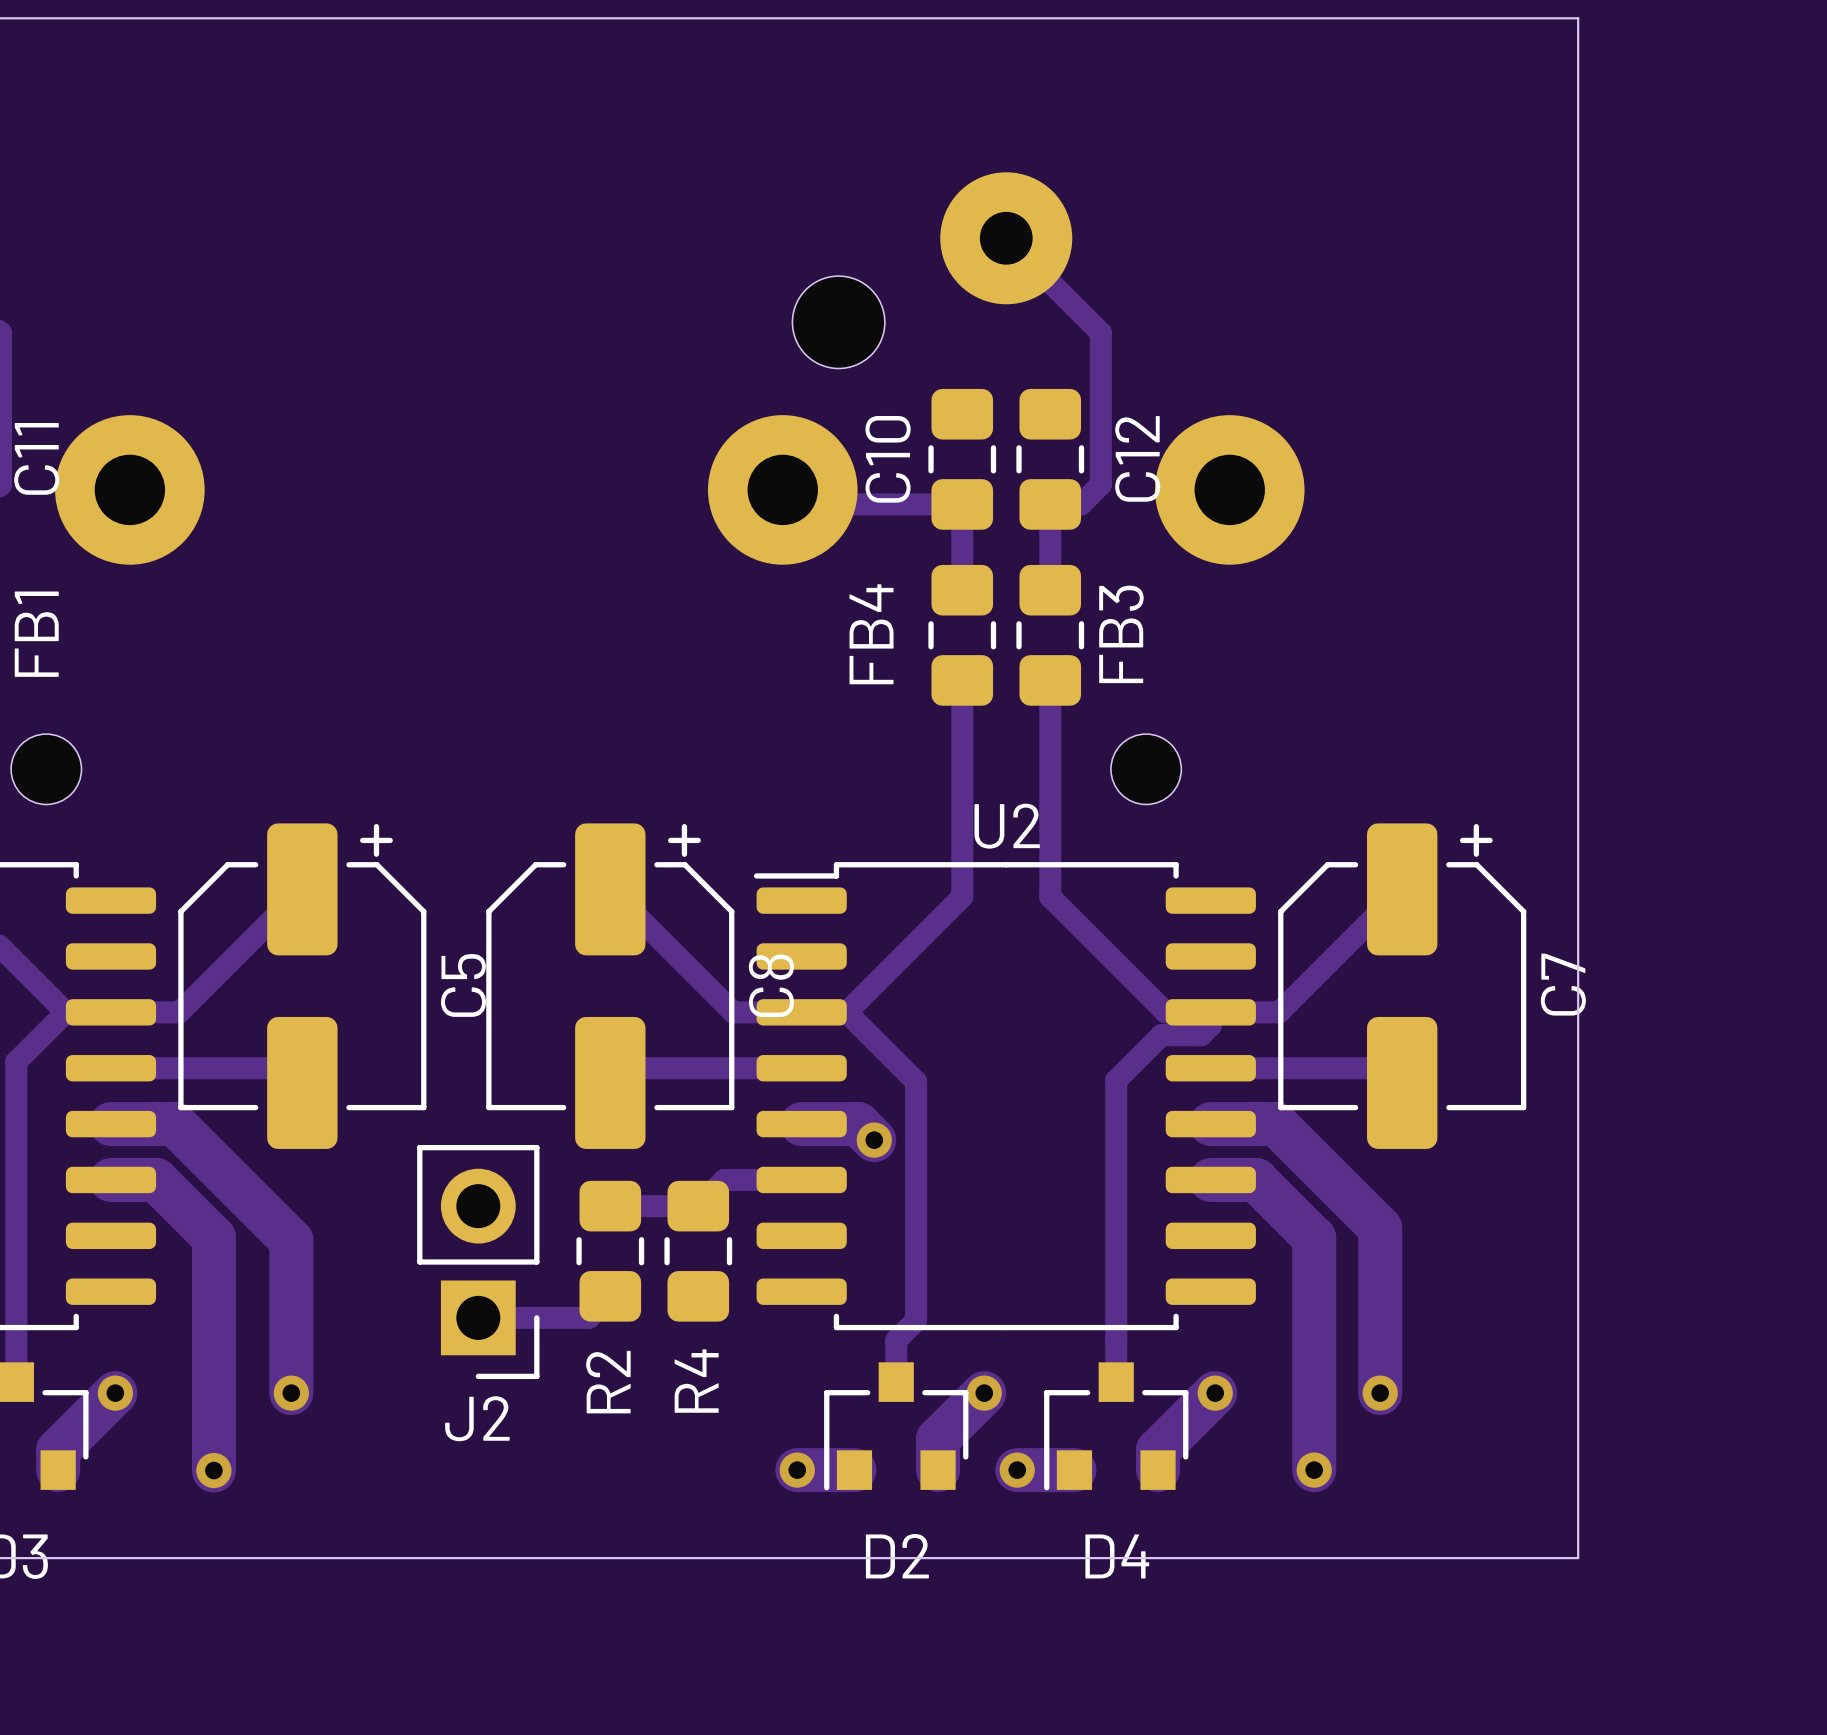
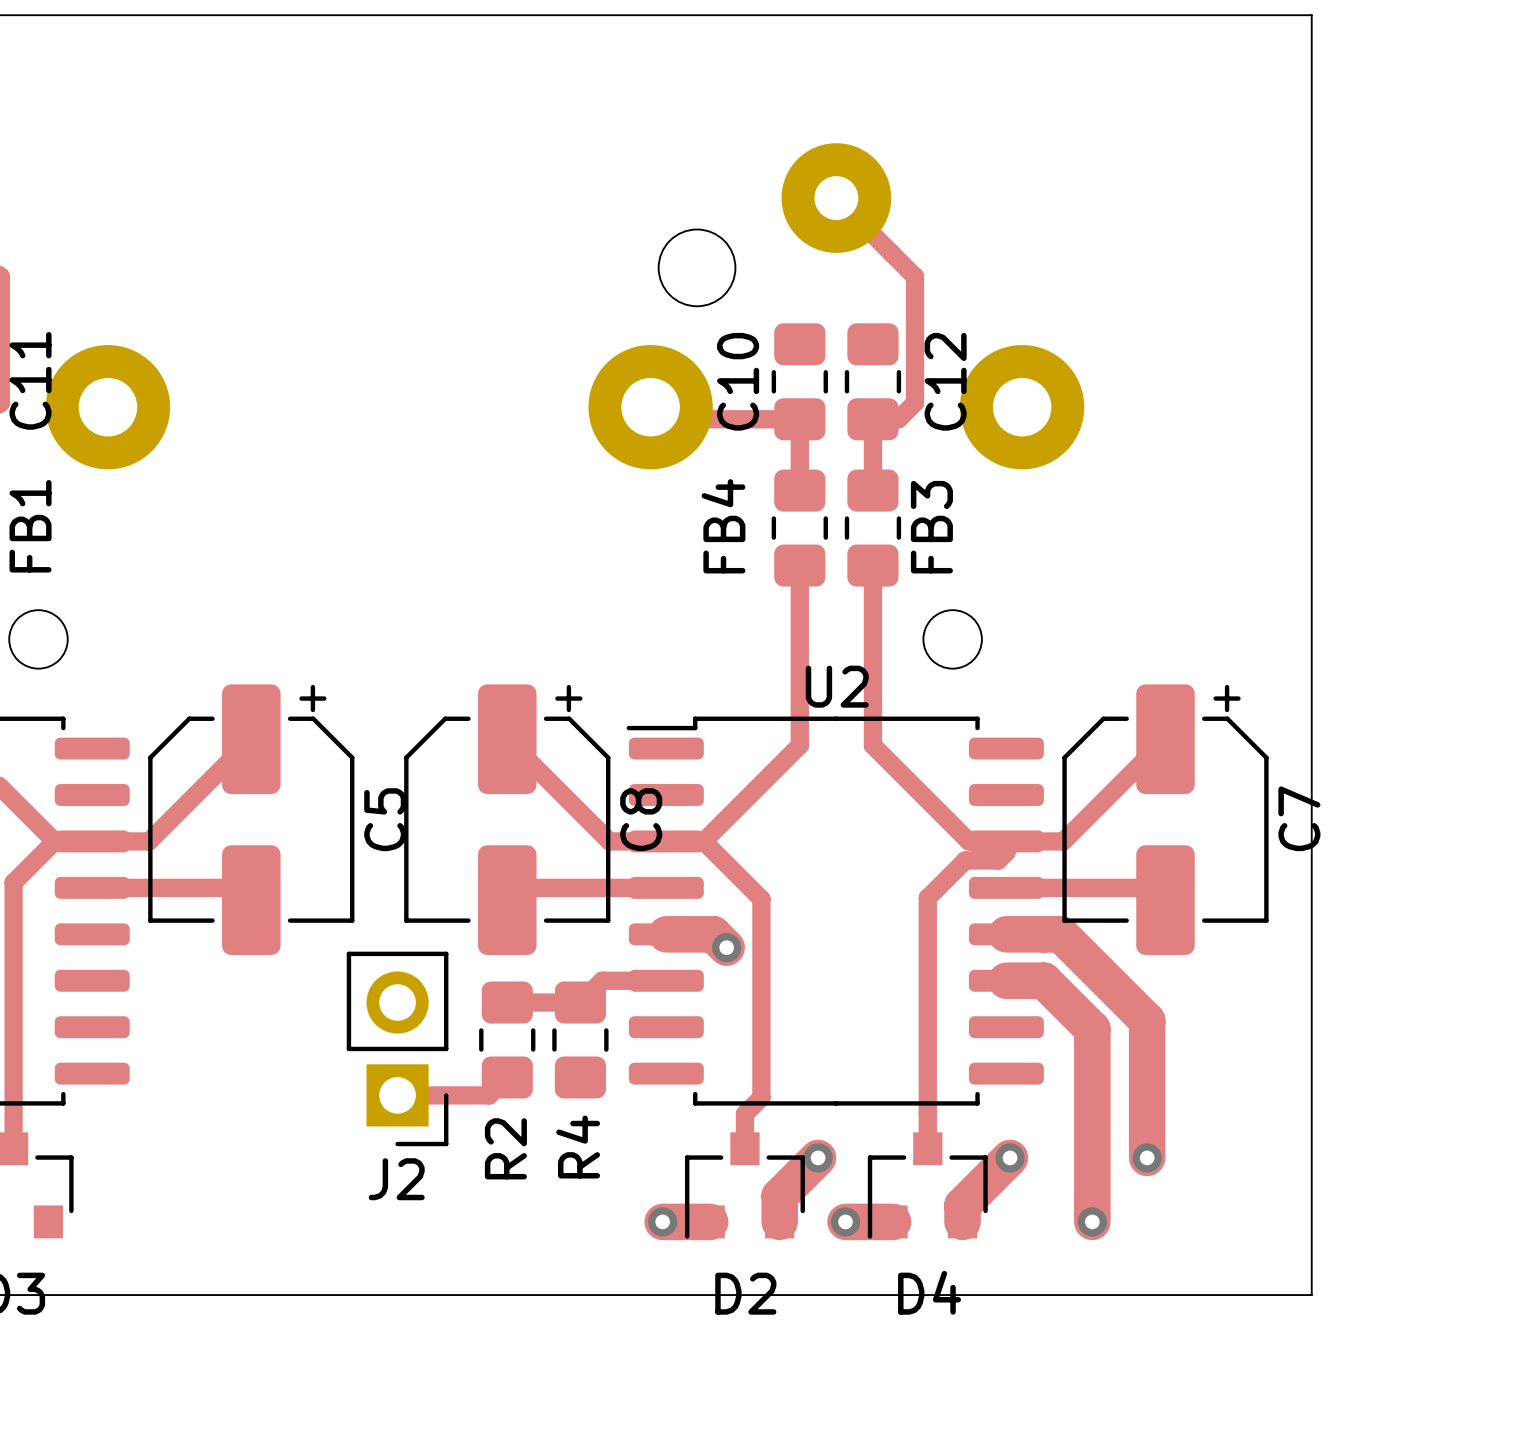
track: (110, 1124) (174, 1124) (291, 1240) (291, 1393) -> none
track: (110, 1179) (156, 1179) (213, 1237) (213, 1470) -> none
track: (115, 1393) (58, 1450) (58, 1470) -> none
via: (115, 1393) -> none
via: (291, 1393) -> none
via: (213, 1470) -> none

